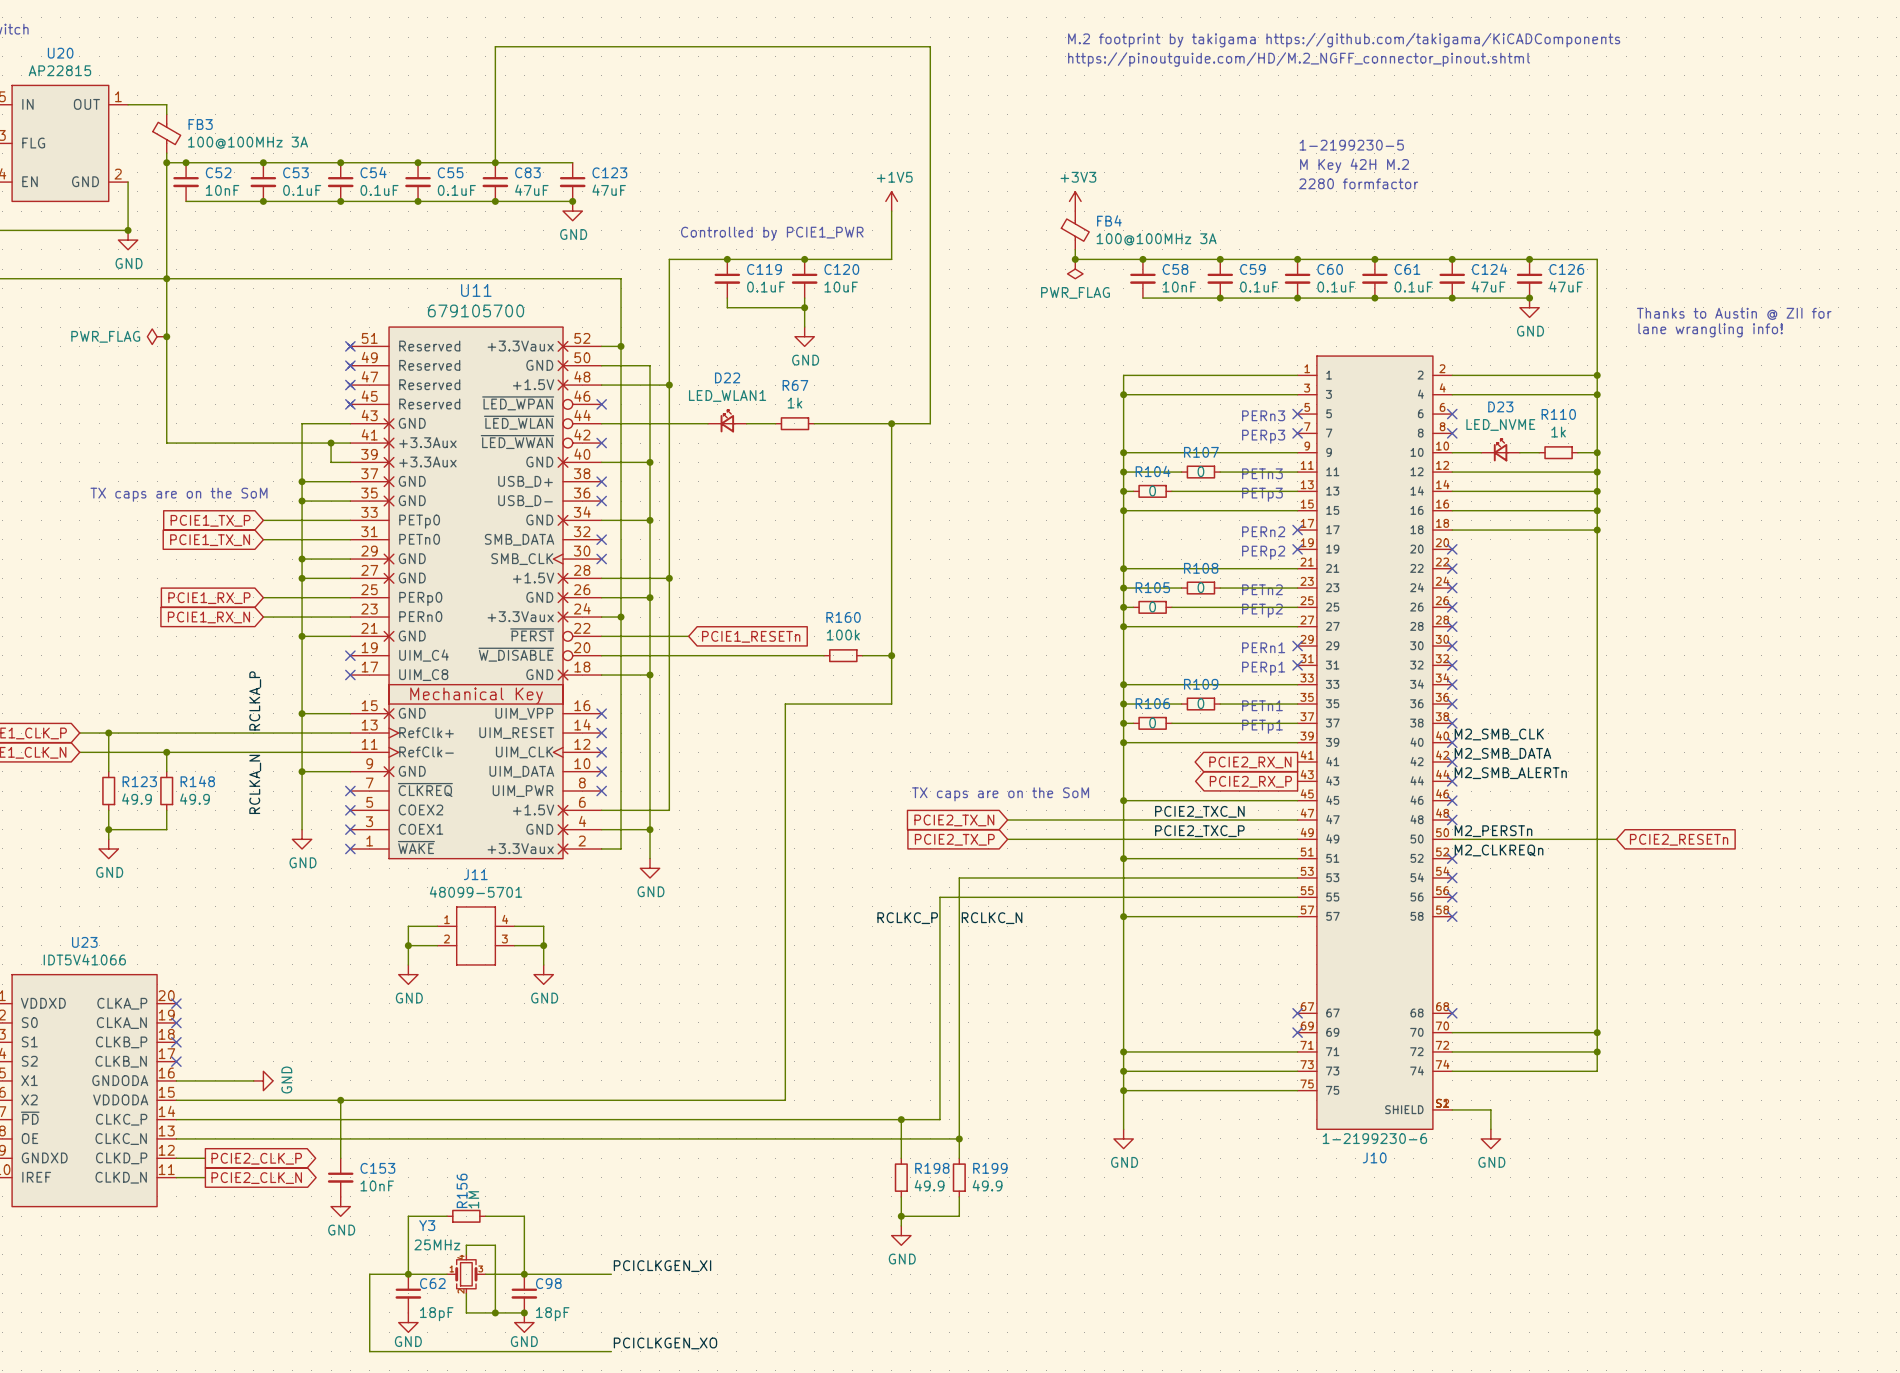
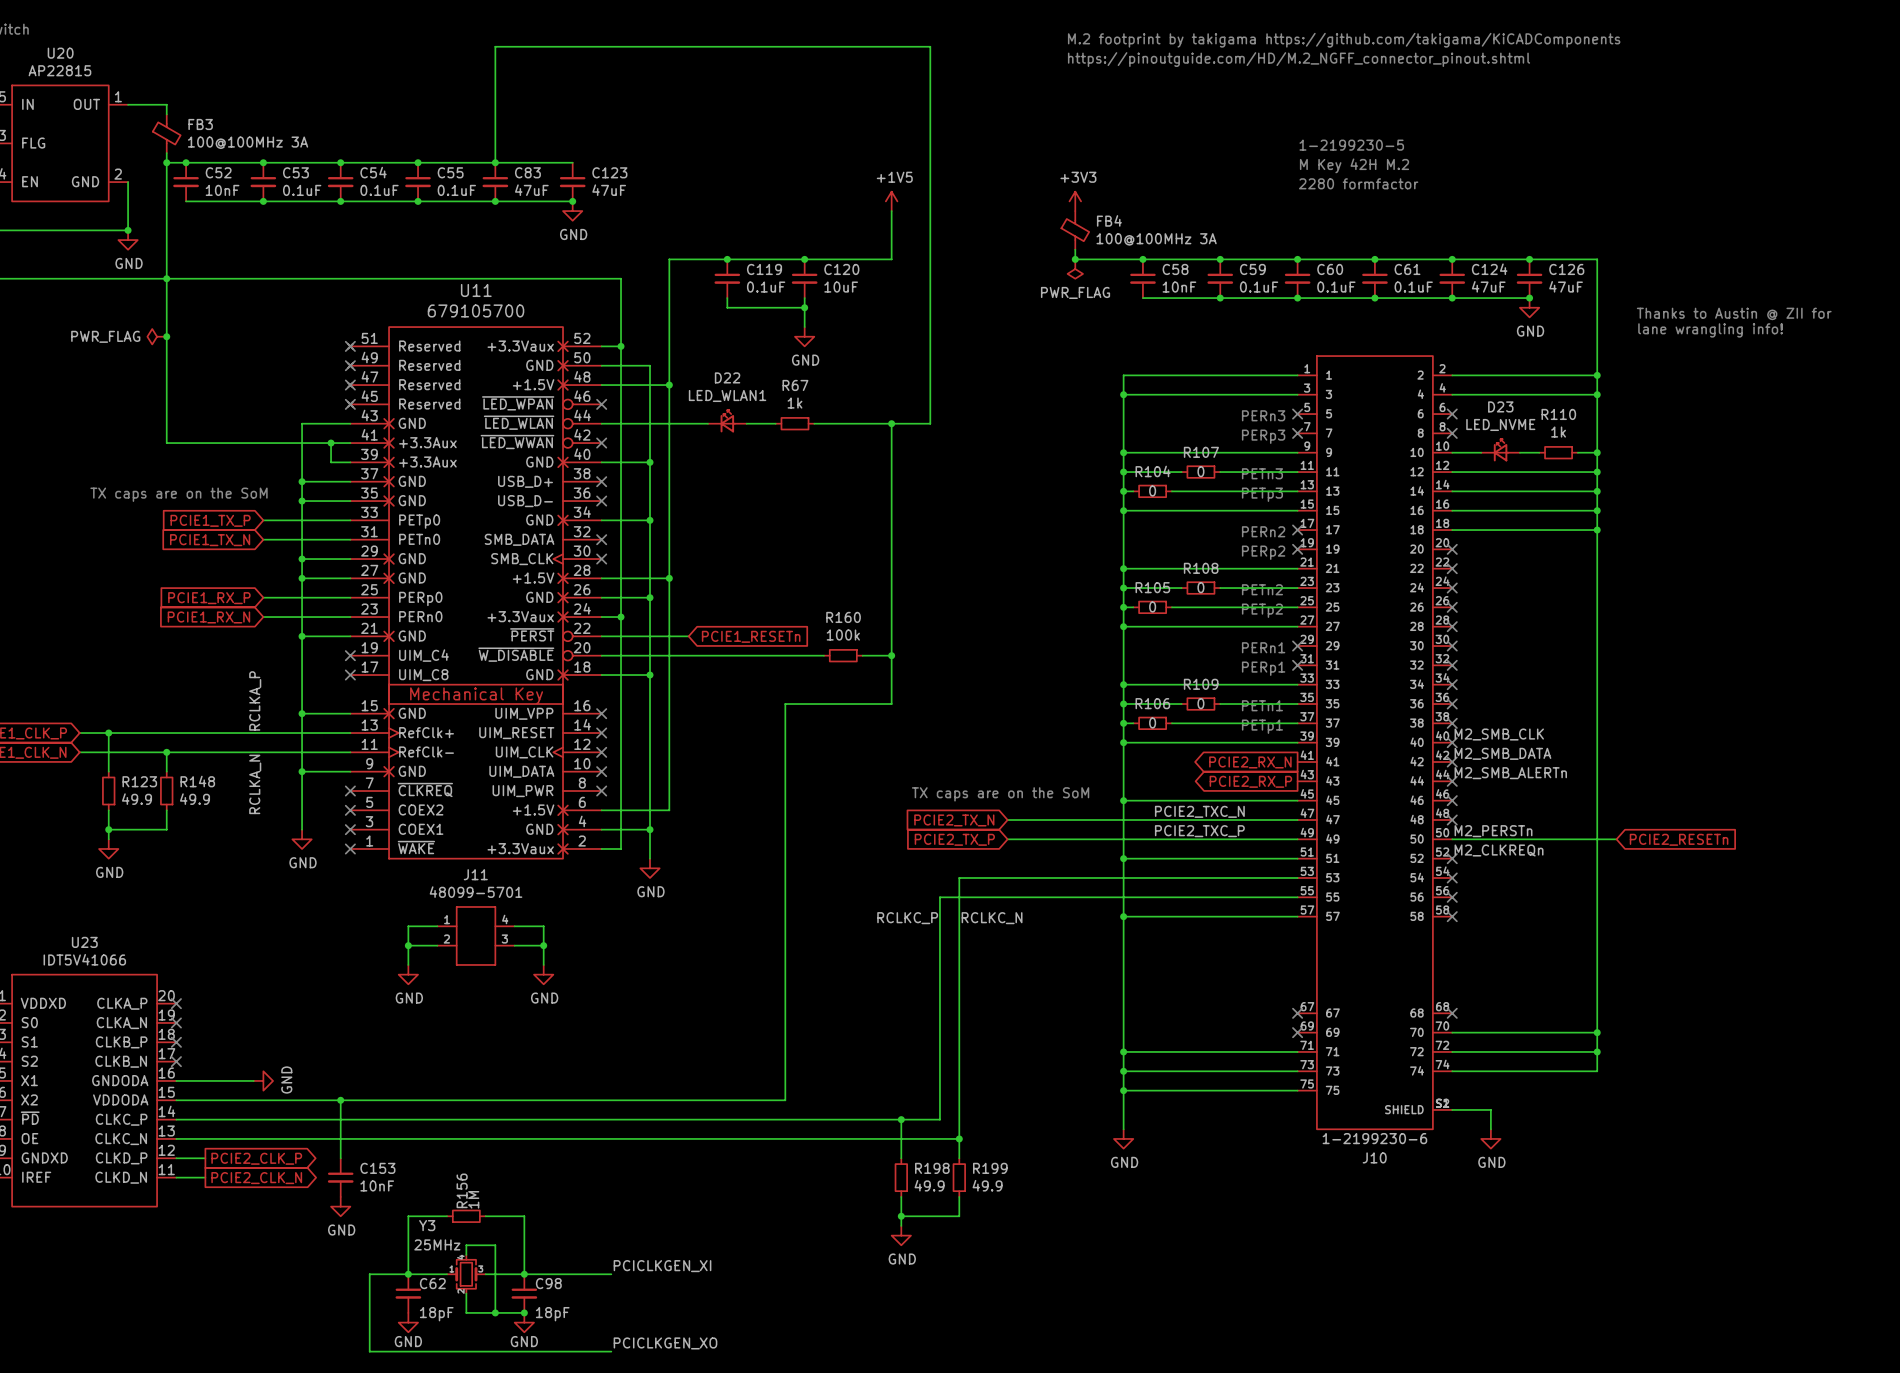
text: Controlled by PCIE1_PWR (772, 233) -> none

